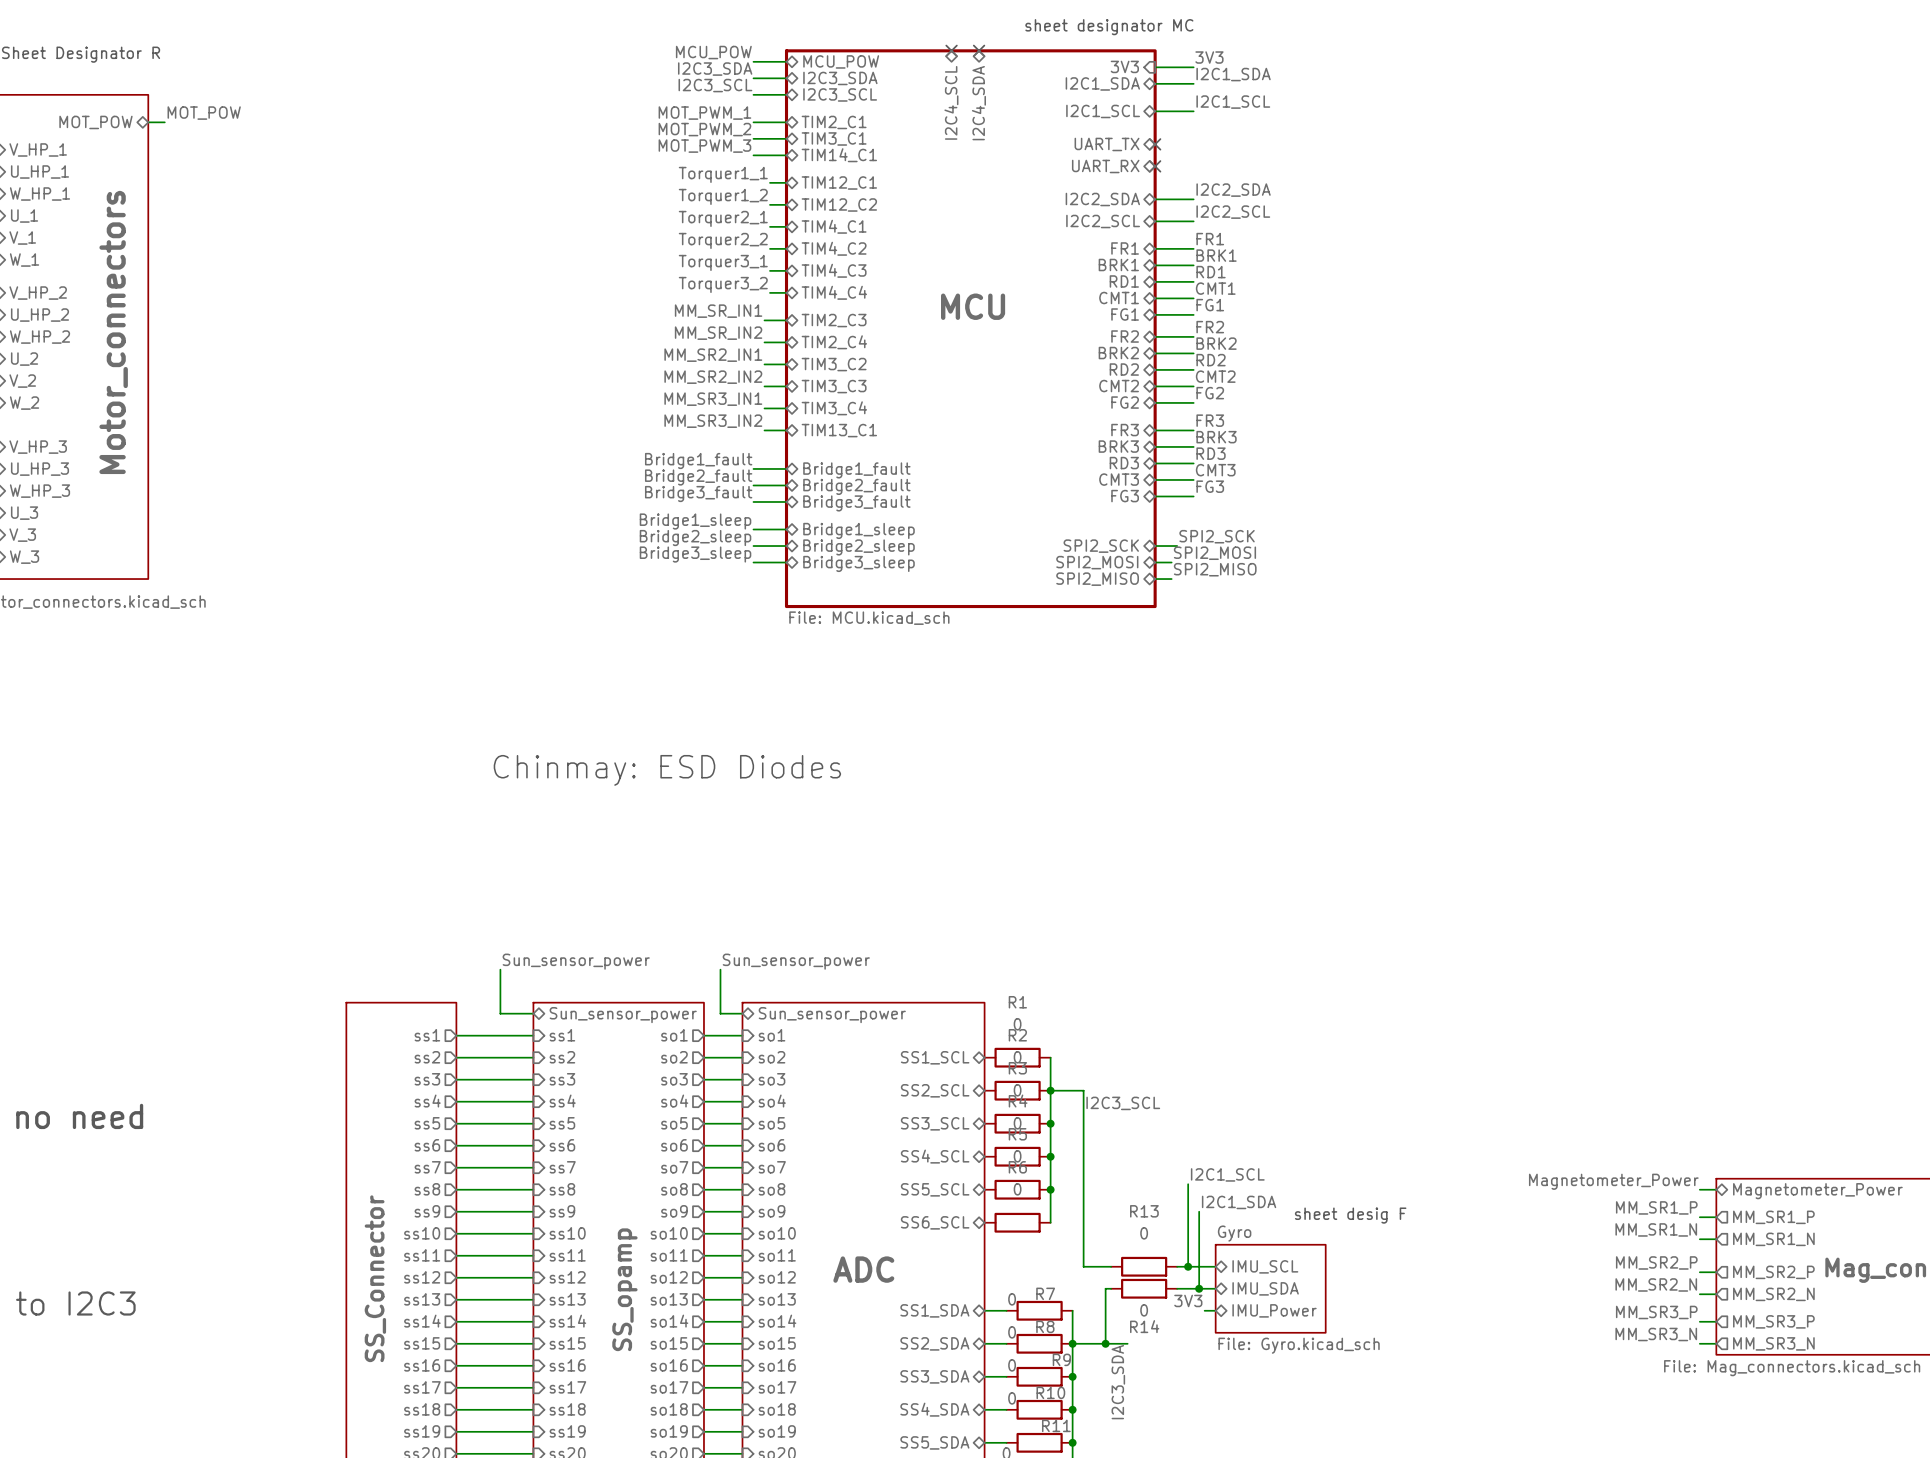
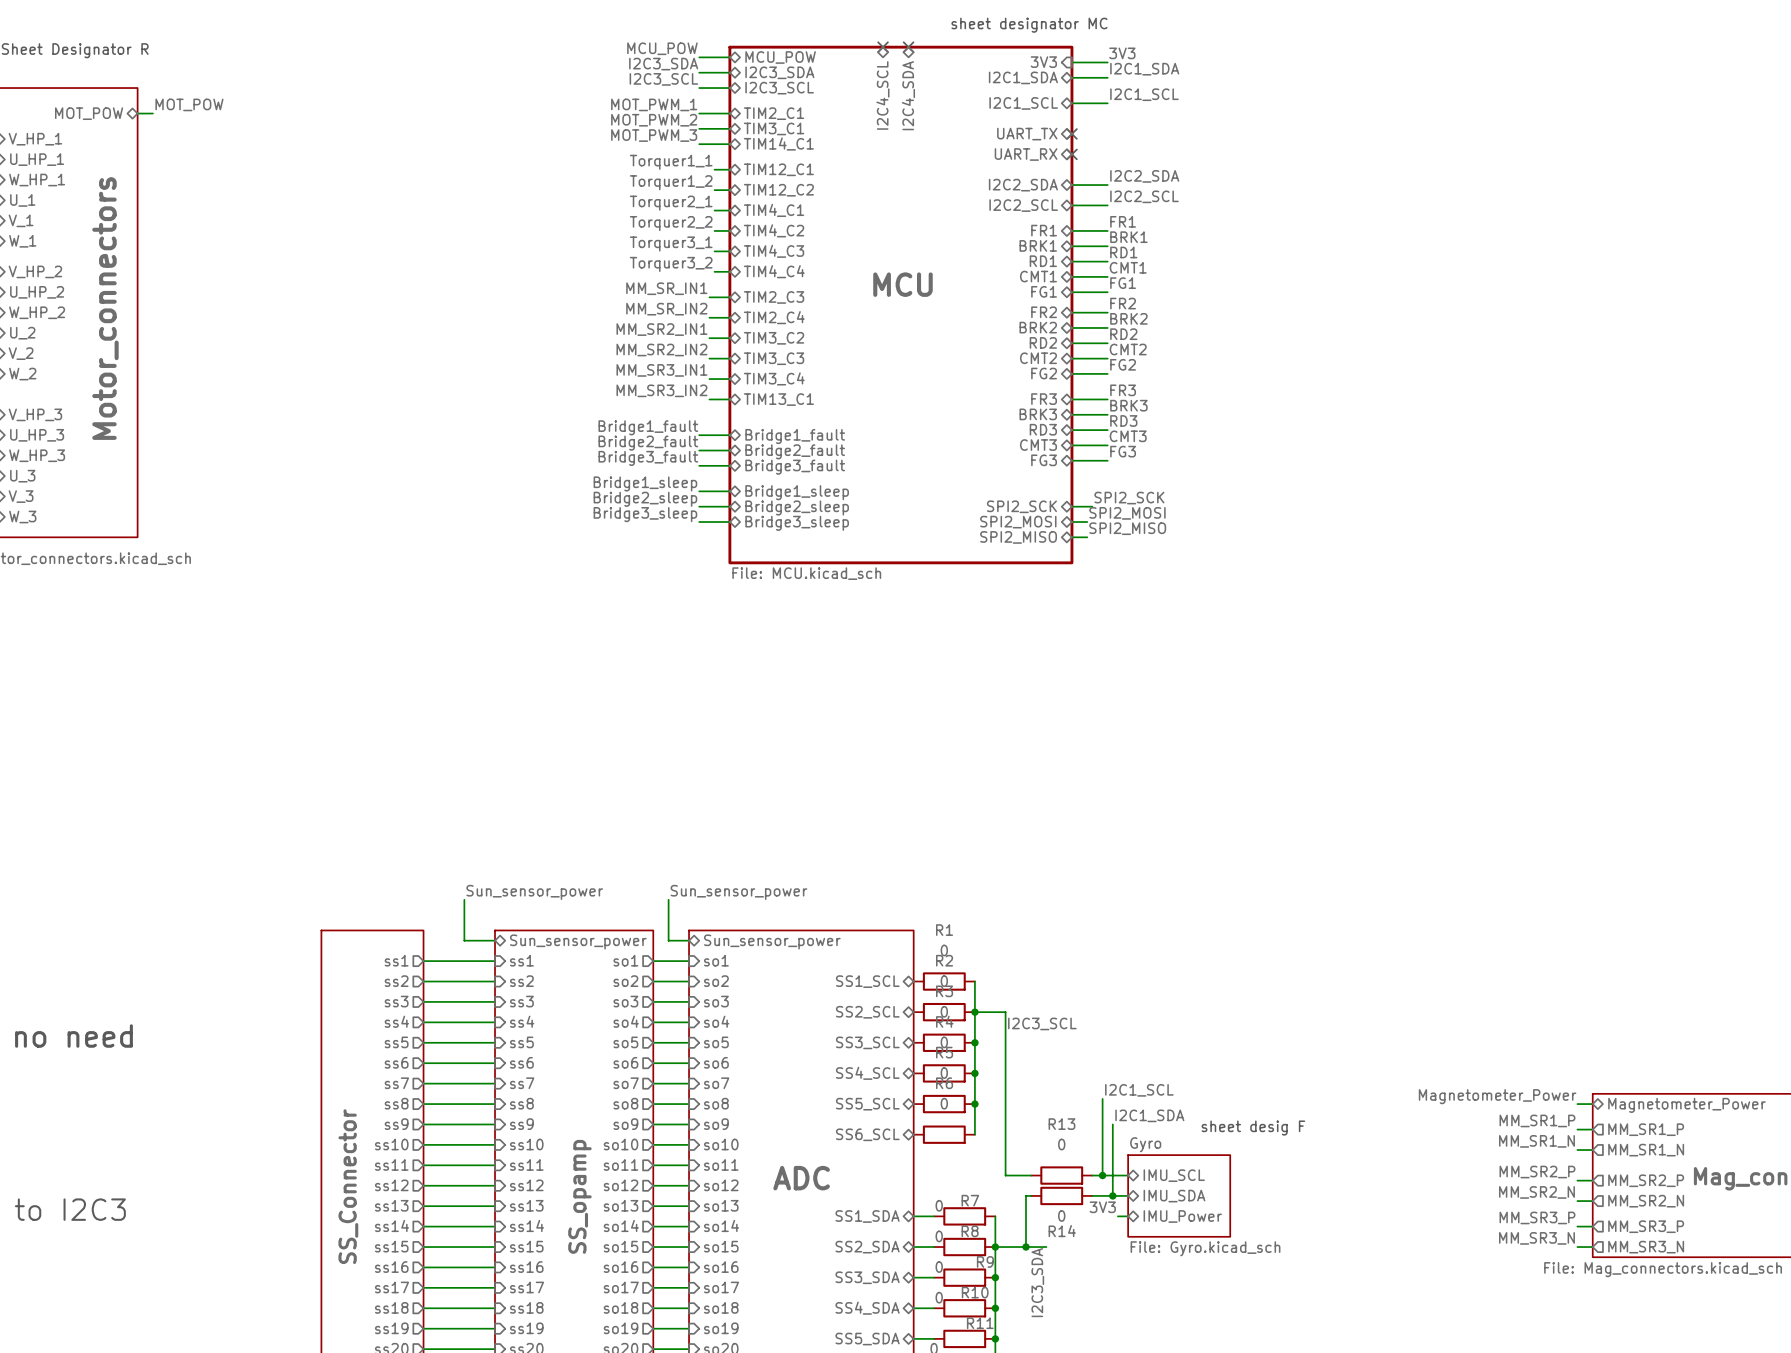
text: Chinmay: ESD Diodes (667, 770) -> none

